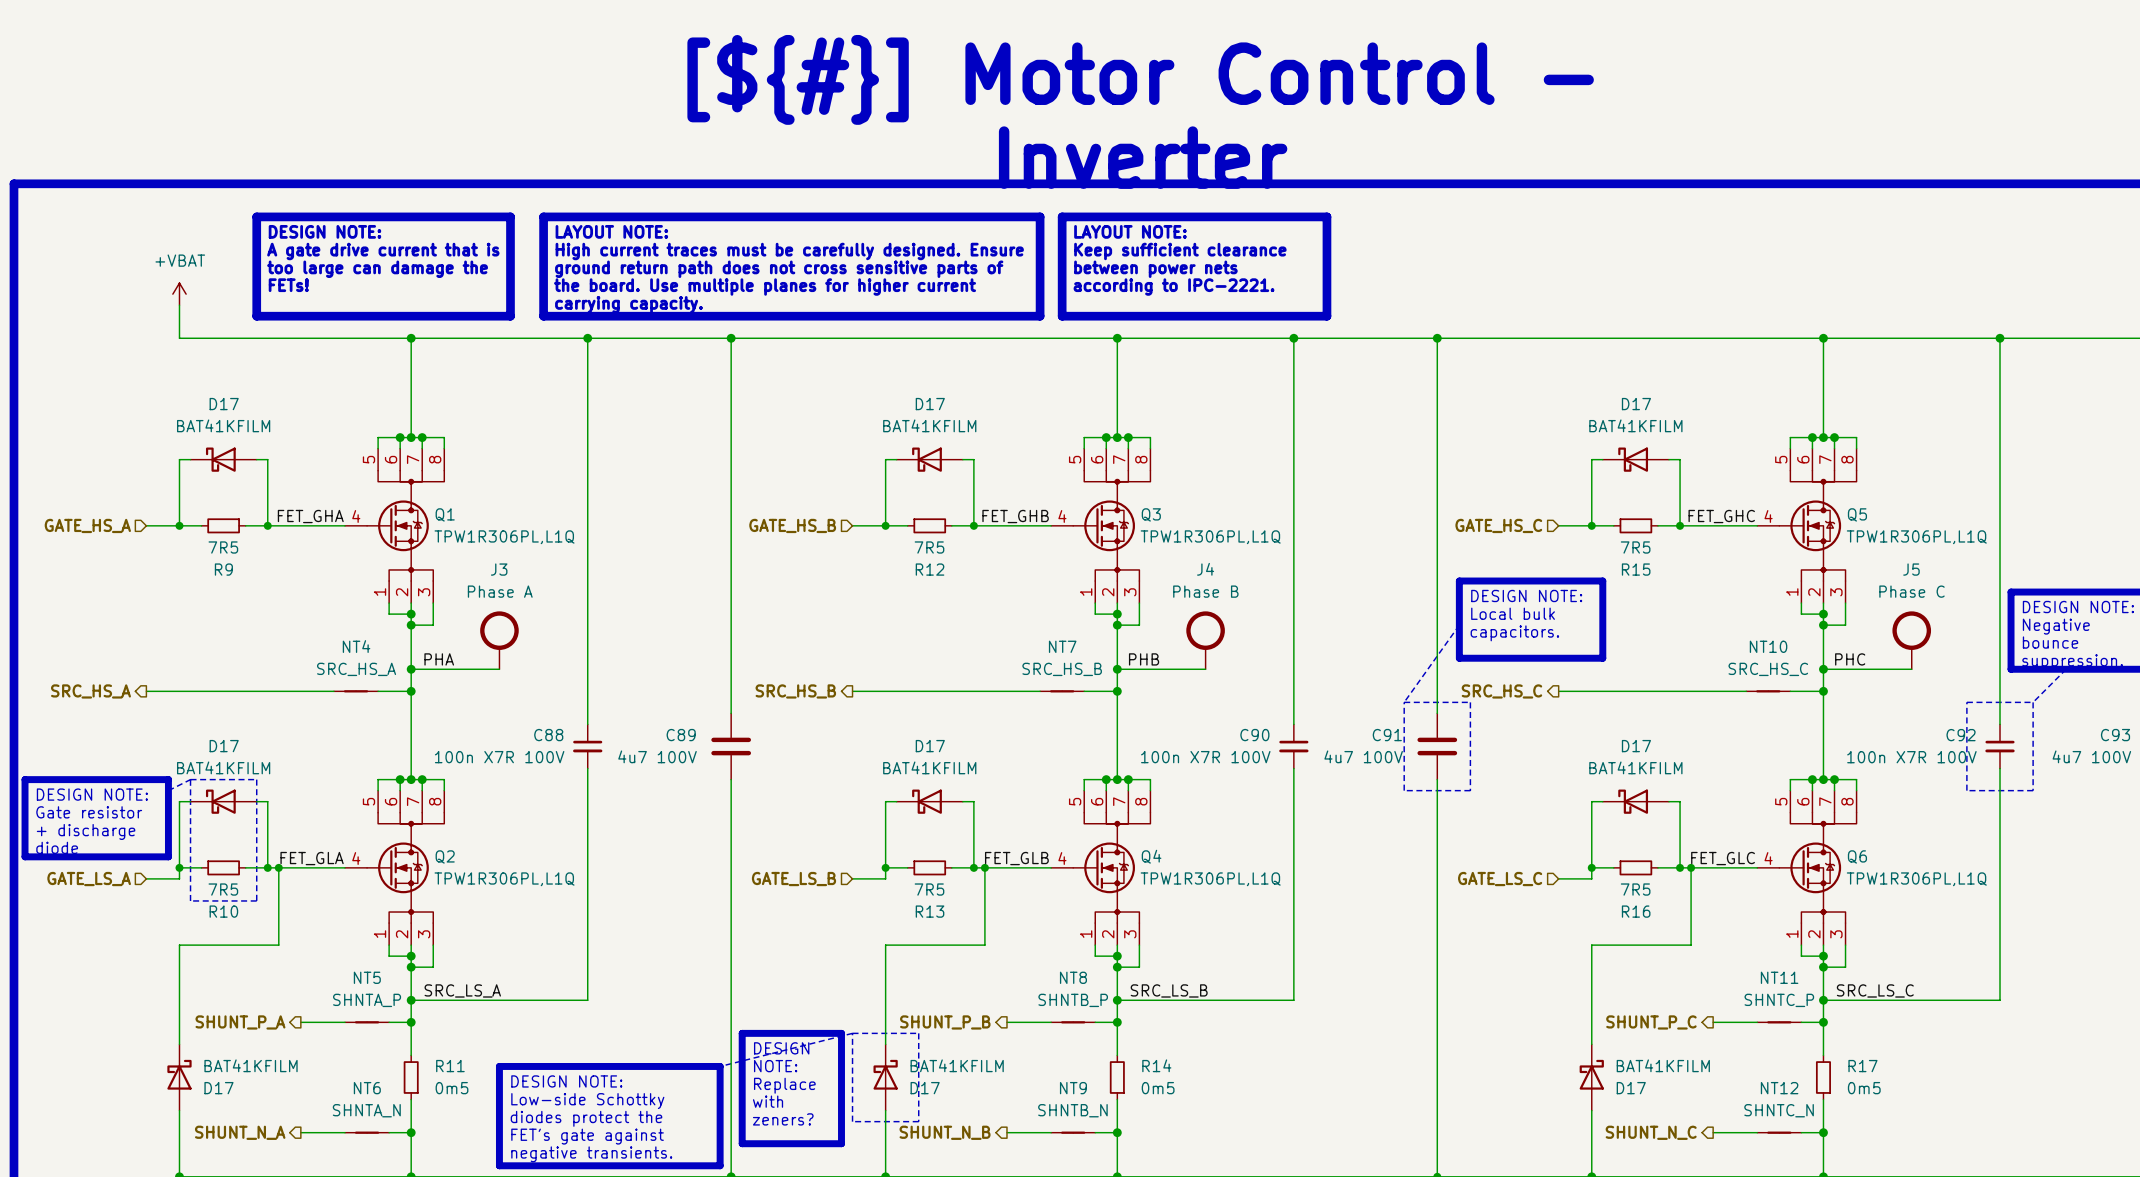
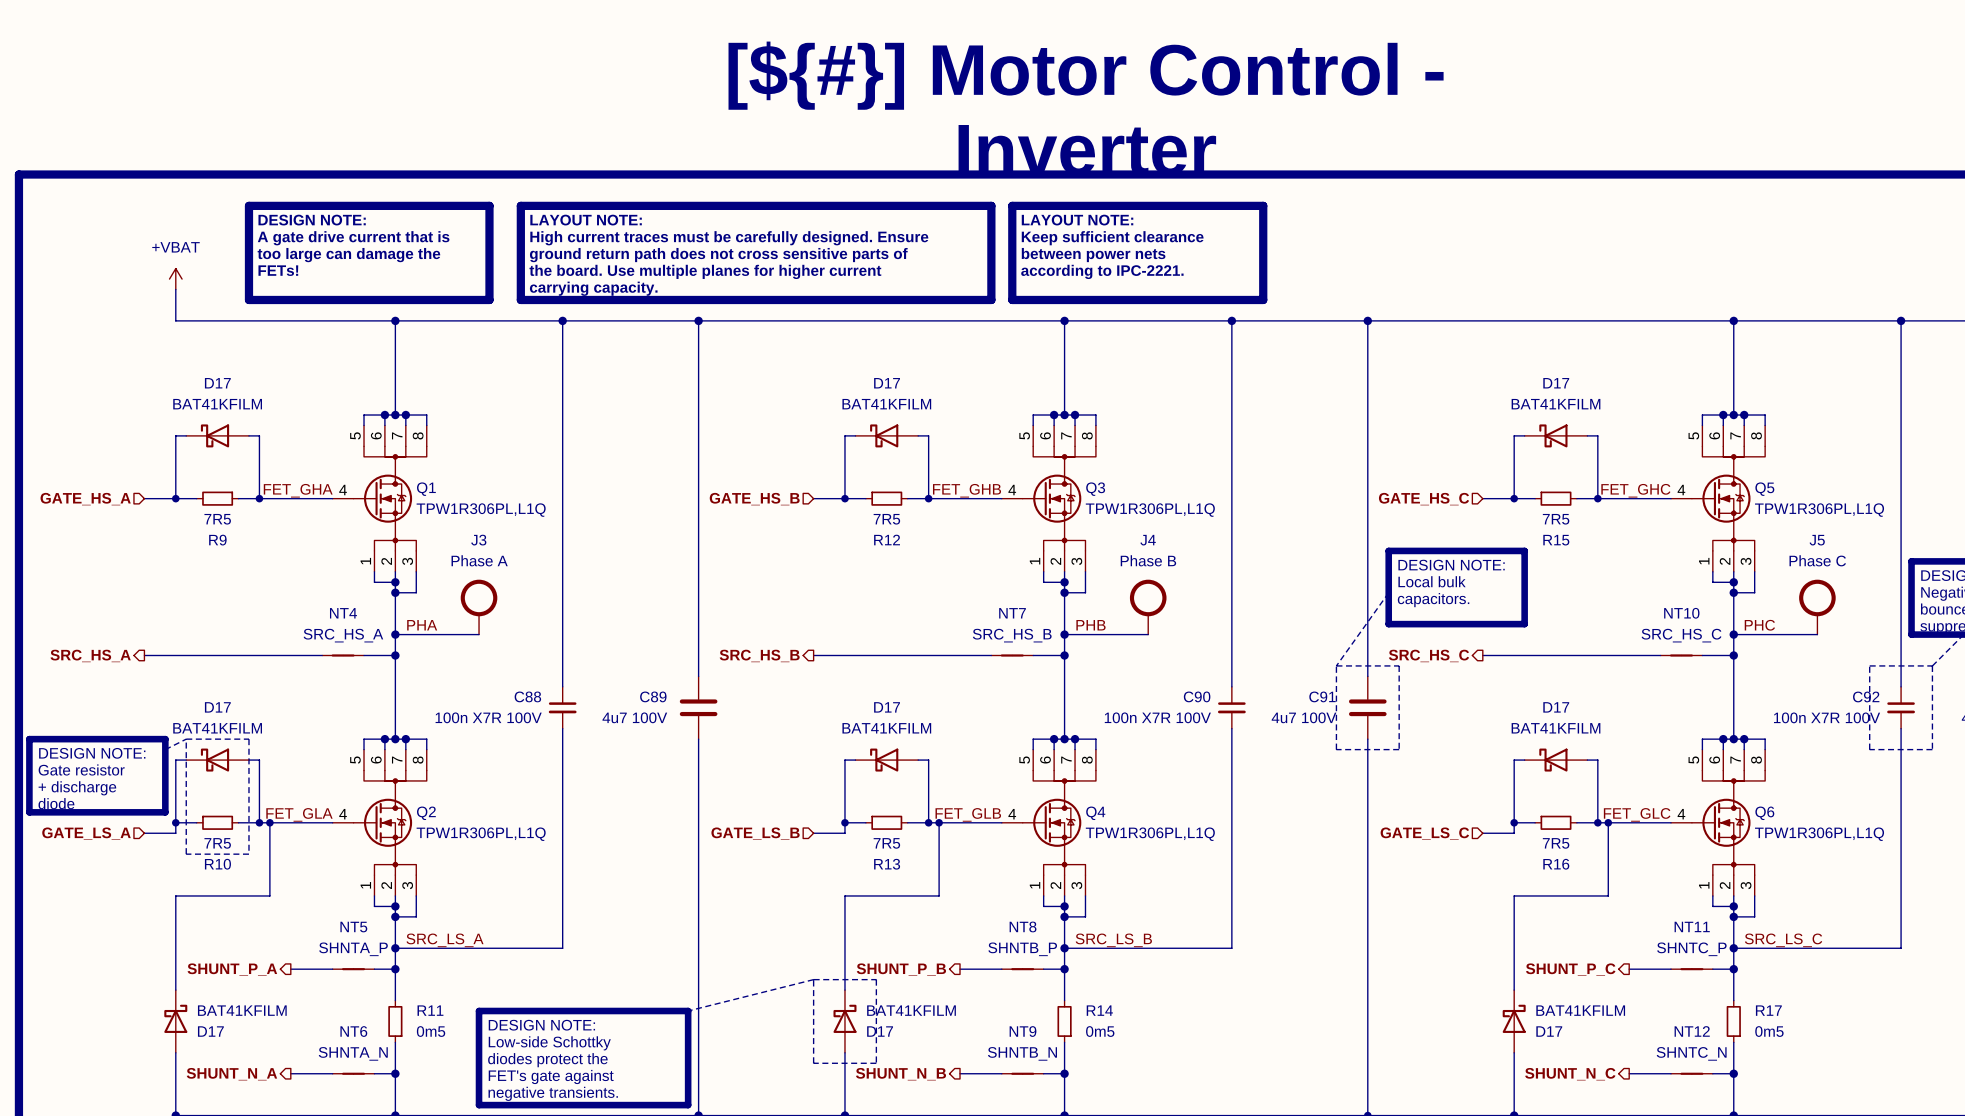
line: (742, 1033) (841, 1033) (841, 1143) (742, 1143) (742, 1033) -> none
text: DESIGN (781, 1048) -> none
text: NOTE: (775, 1066) -> none
text: Replace (784, 1085) -> none
text: with (768, 1101) -> none
text: zeners? (783, 1119) -> none

